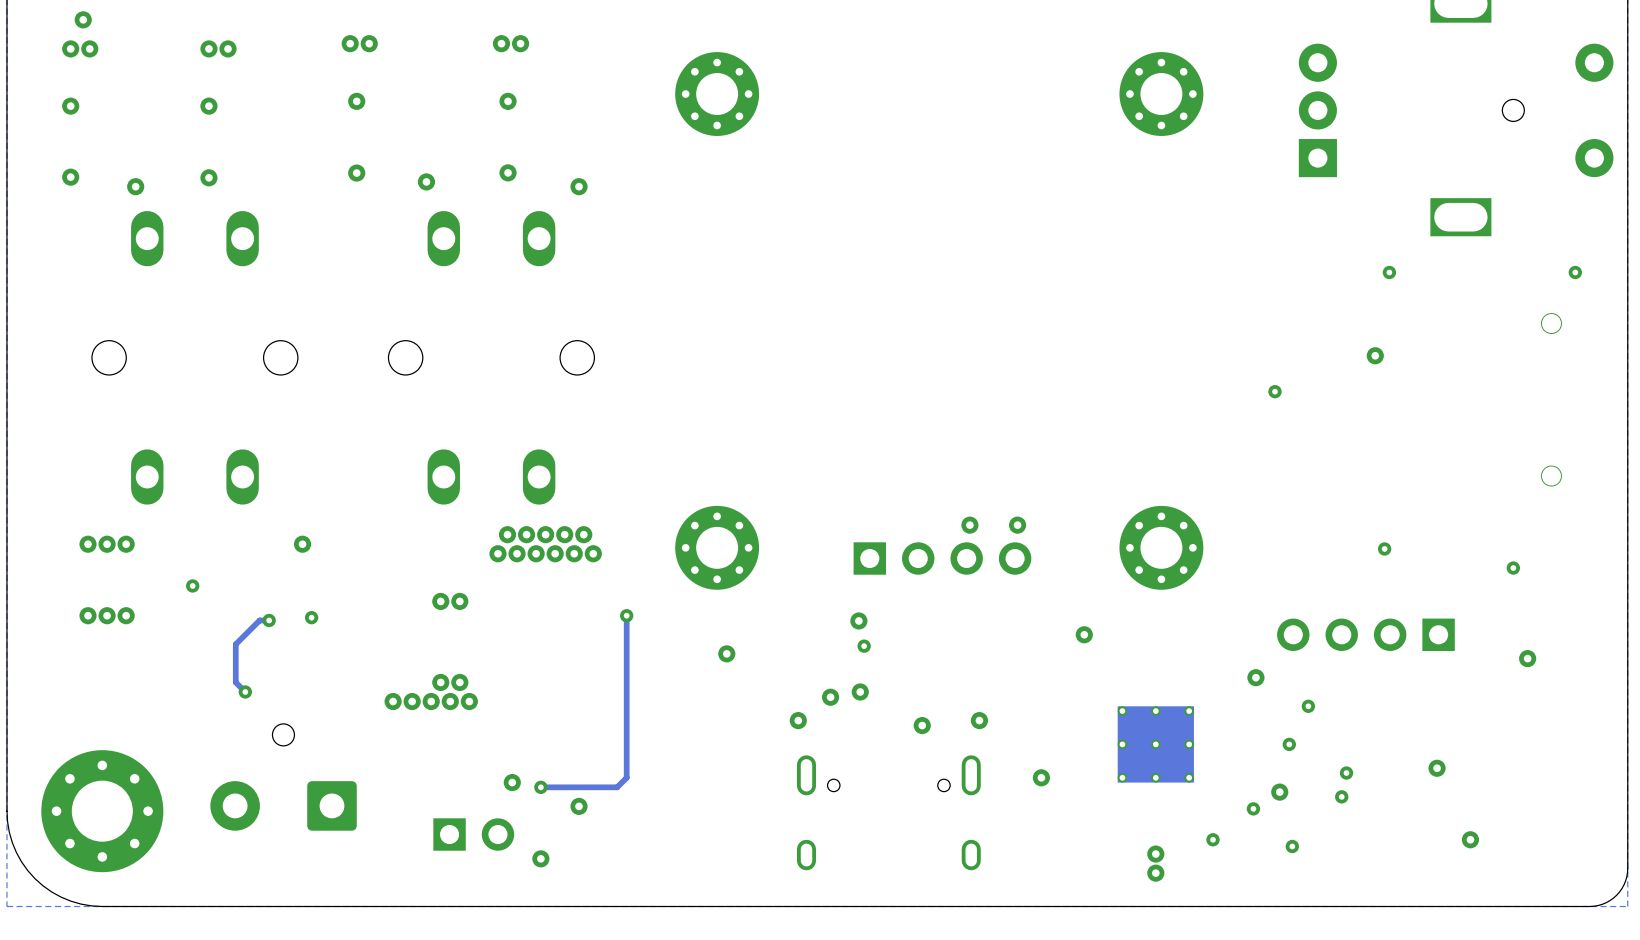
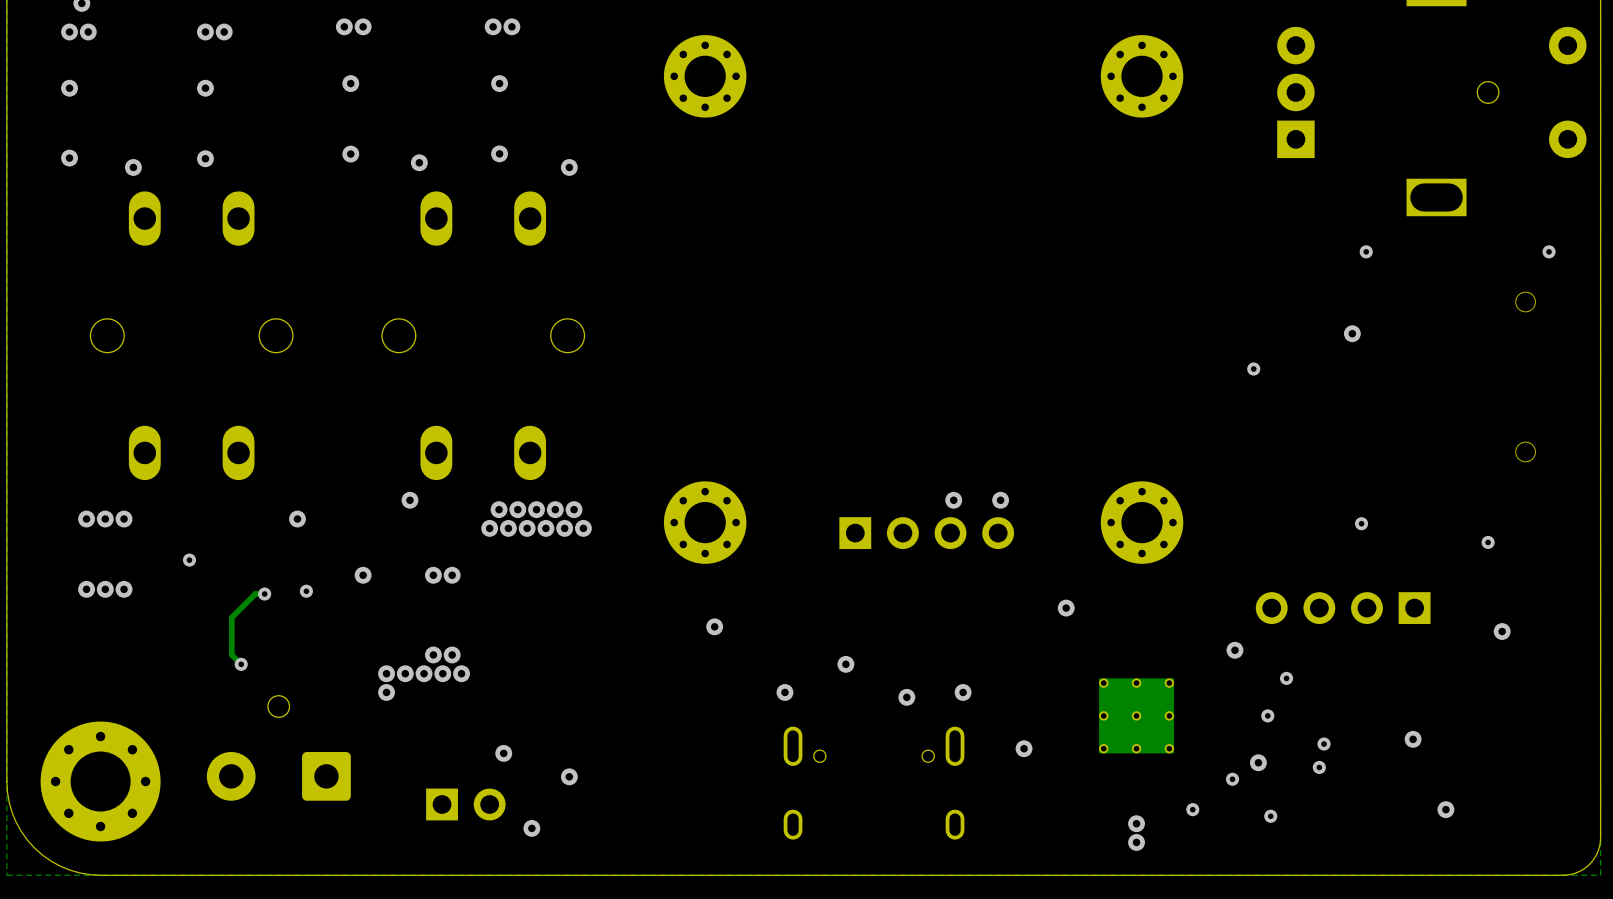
via: none -> (409, 500)
via: none -> (363, 575)
track: (626, 615) (626, 777) (617, 787) (540, 787) -> none
via: (626, 615) -> none
via: (858, 620) -> none
via: (864, 646) -> none
via: (830, 697) -> none
via: none -> (386, 692)
via: (540, 787) -> none

